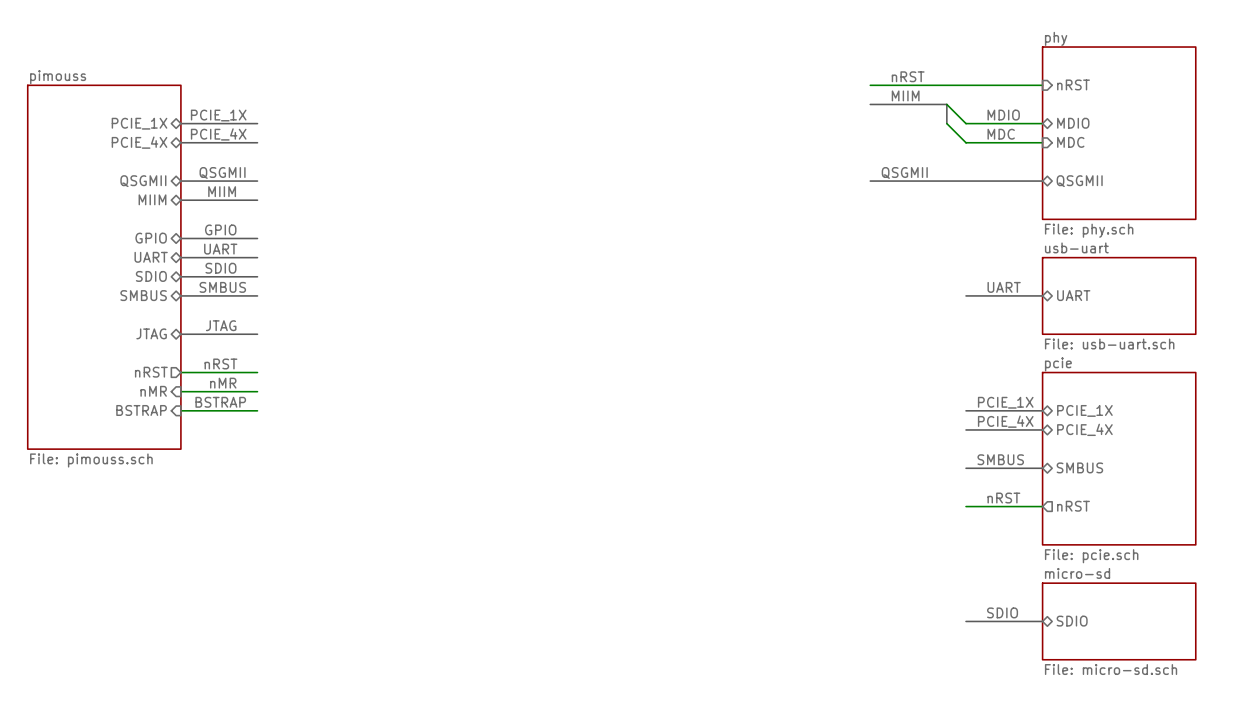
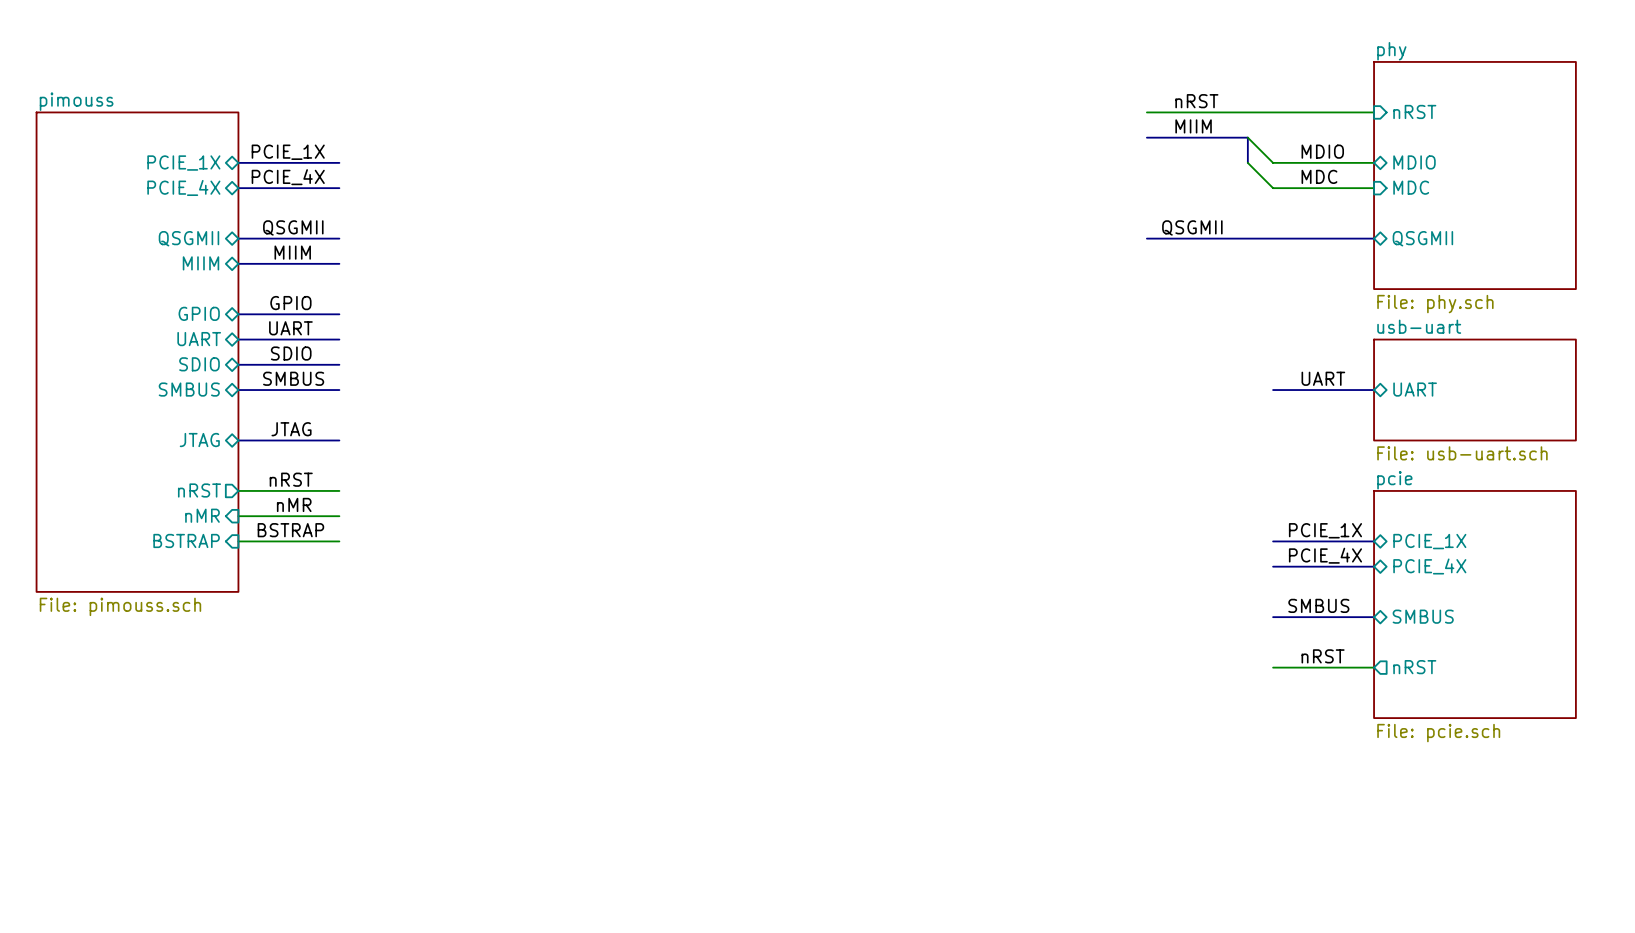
label: SDIO (1002, 612) -> none
bus: (965, 621) (1042, 621) -> none
sheet pin: SDIO (1072, 621) -> none
sheet micro-sd: File: micro-sd.sch (1119, 621) -> none

